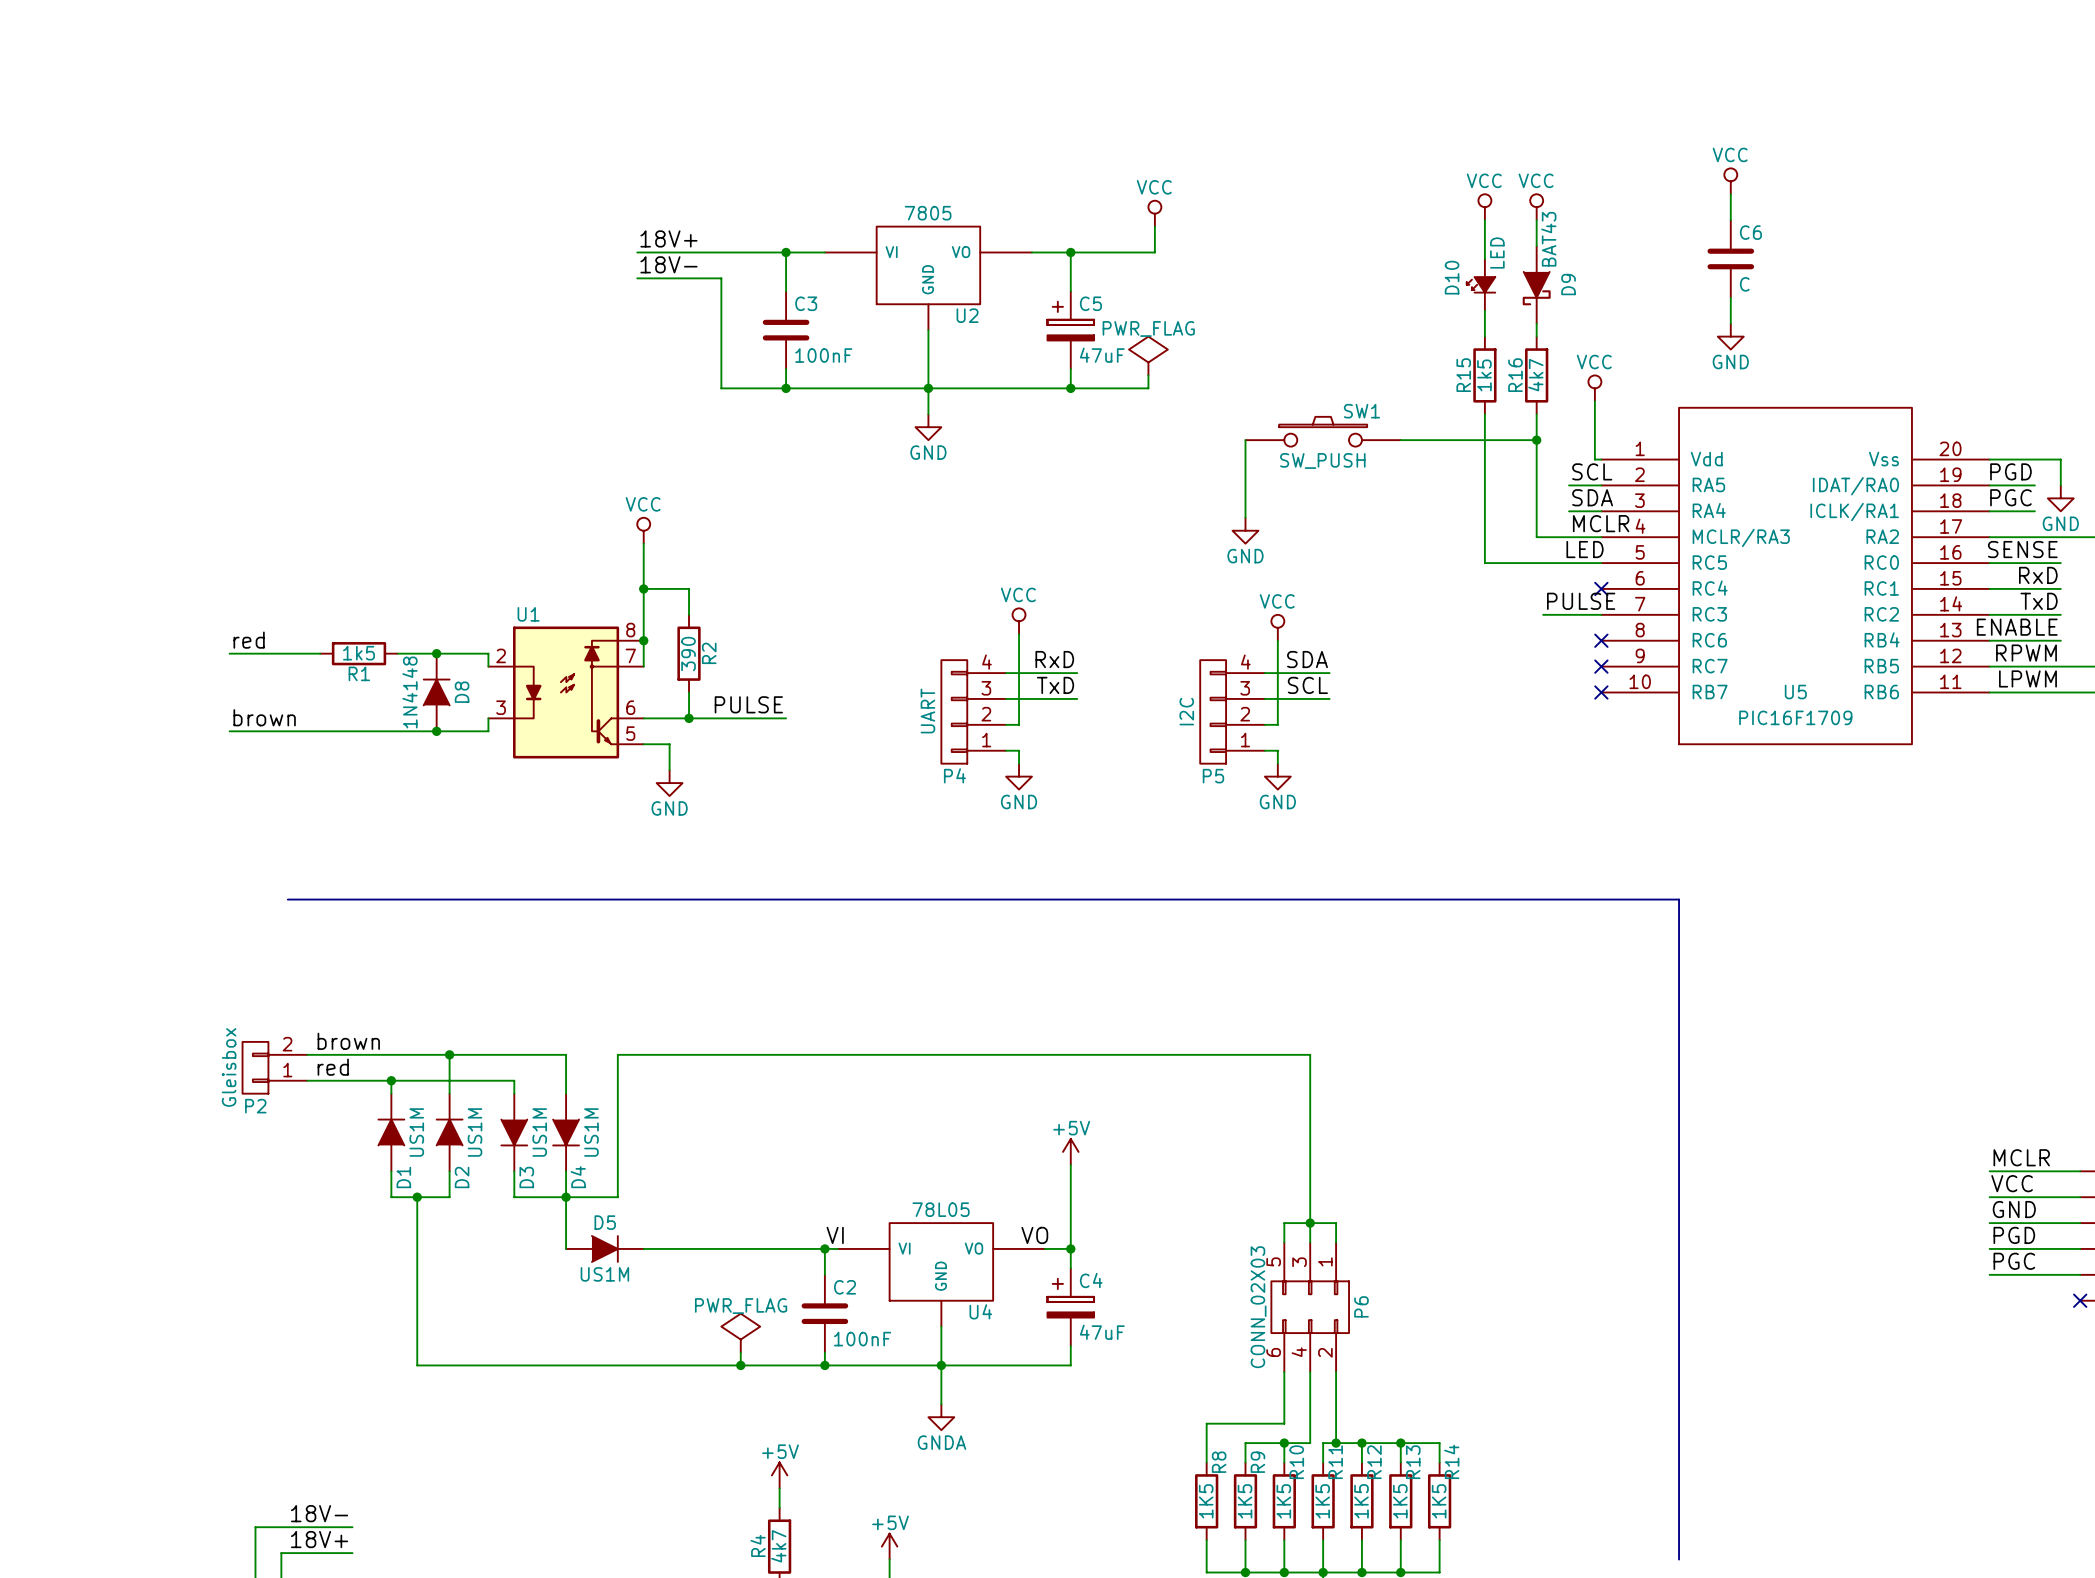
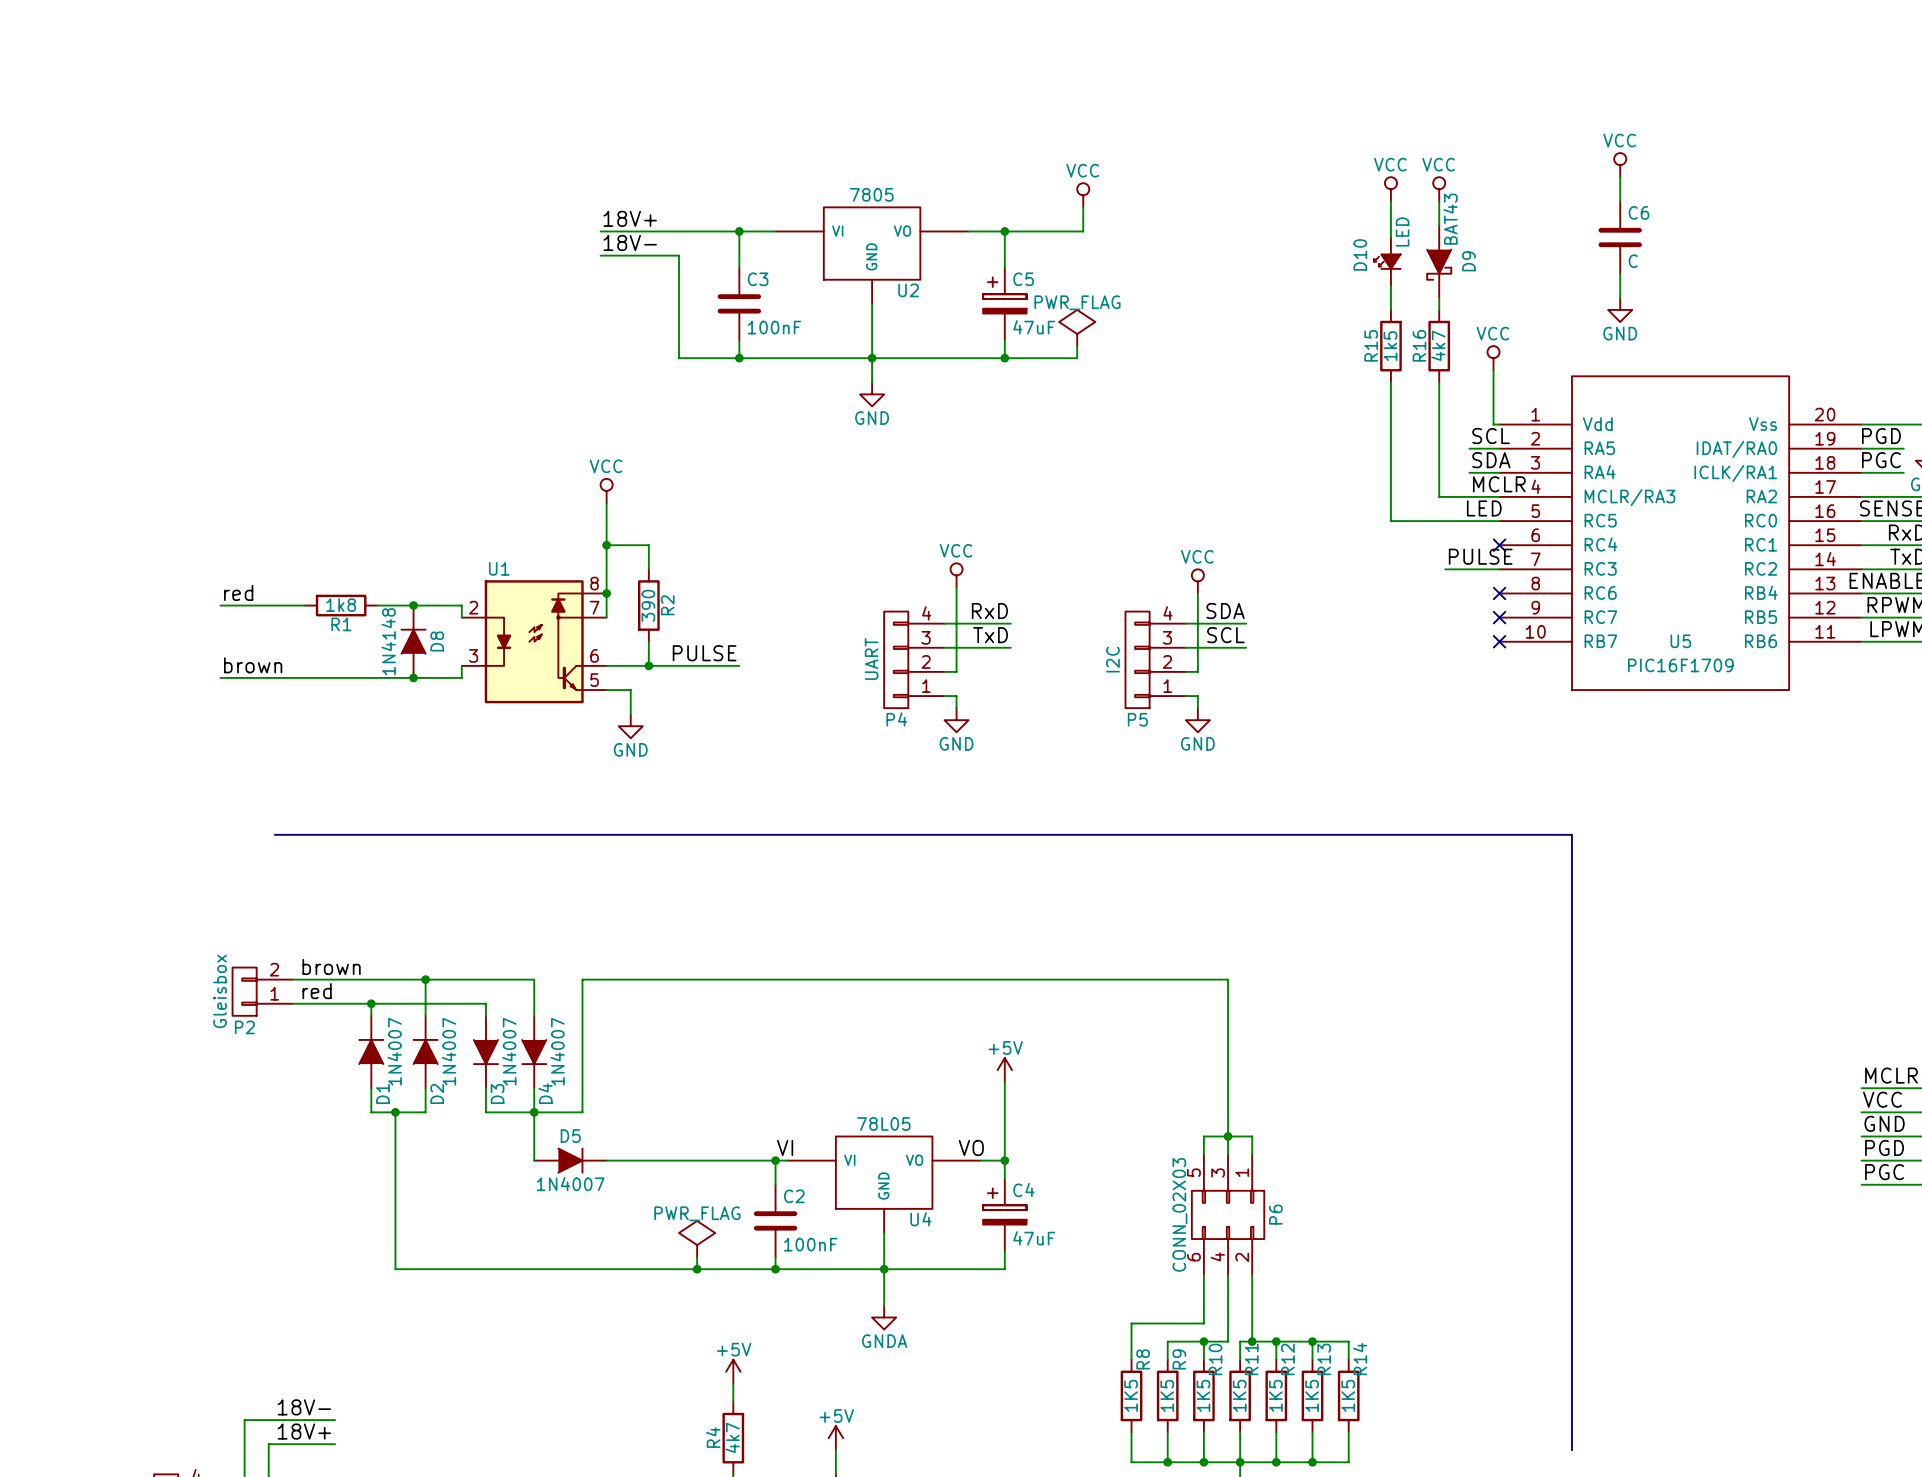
SW1: SW_PUSH (1323, 431) -> none
wire: (1245, 440) (1245, 517) -> none
wire: (1400, 440) (1536, 440) -> none
junction: (1536, 440) -> none
power symbol: GND (1245, 530) -> none
R1 value: 1k5 (359, 653) -> 1k8 (341, 605)
D1 value: US1M (416, 1132) -> 1N4007 (394, 1051)
D2 value: US1M (475, 1132) -> 1N4007 (449, 1051)
D3 value: US1M (539, 1132) -> 1N4007 (509, 1051)
D4 value: US1M (591, 1132) -> 1N4007 (557, 1051)
D5 value: US1M (604, 1274) -> 1N4007 (570, 1184)

